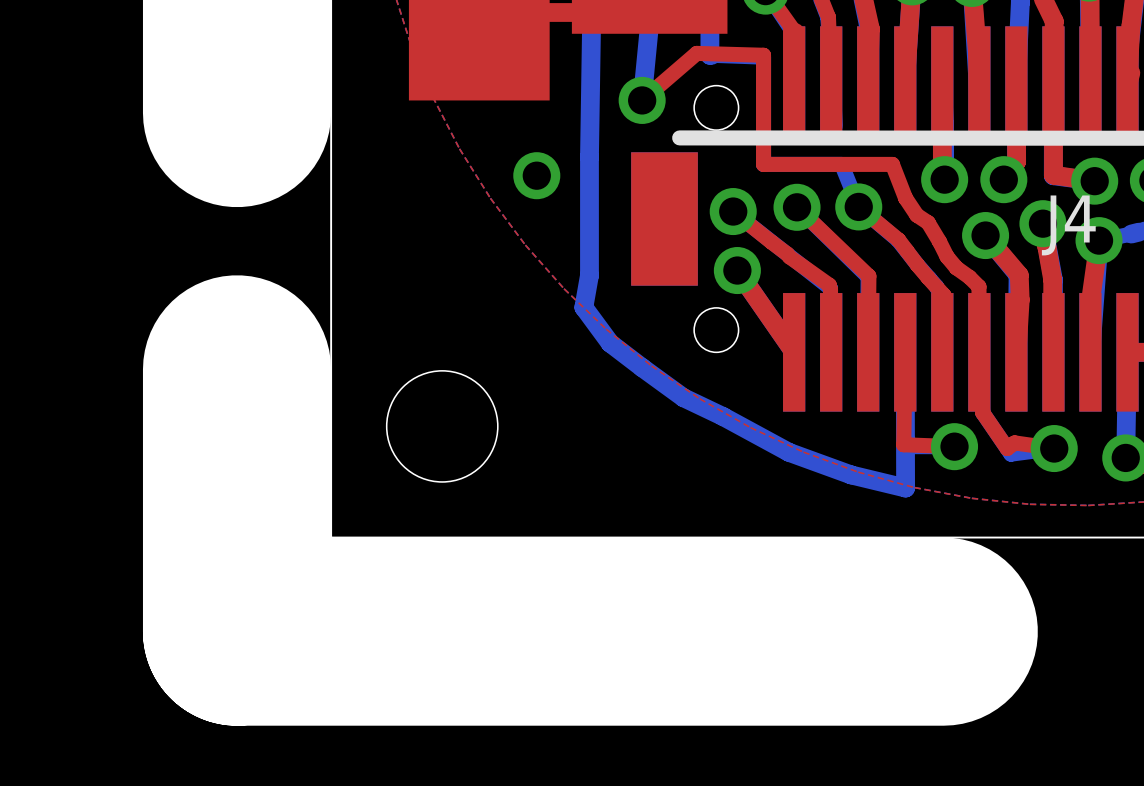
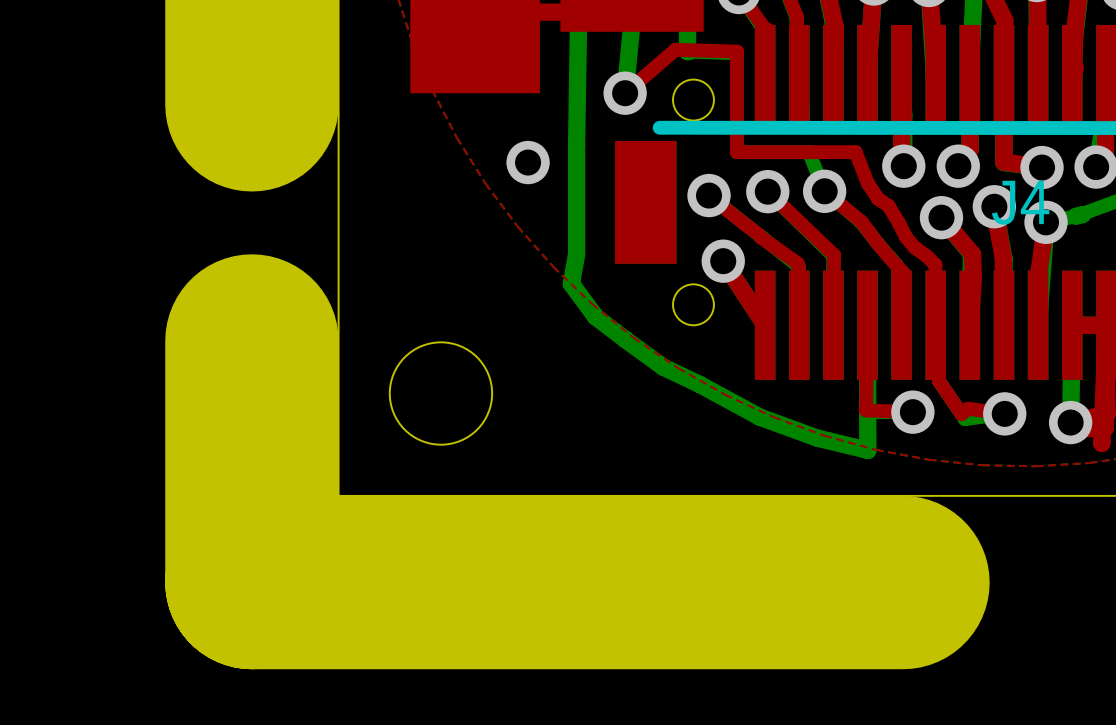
top track: (737, 270) (794, 352) -> (723, 261) (765, 325)
via position: (737, 270) -> (723, 261)

